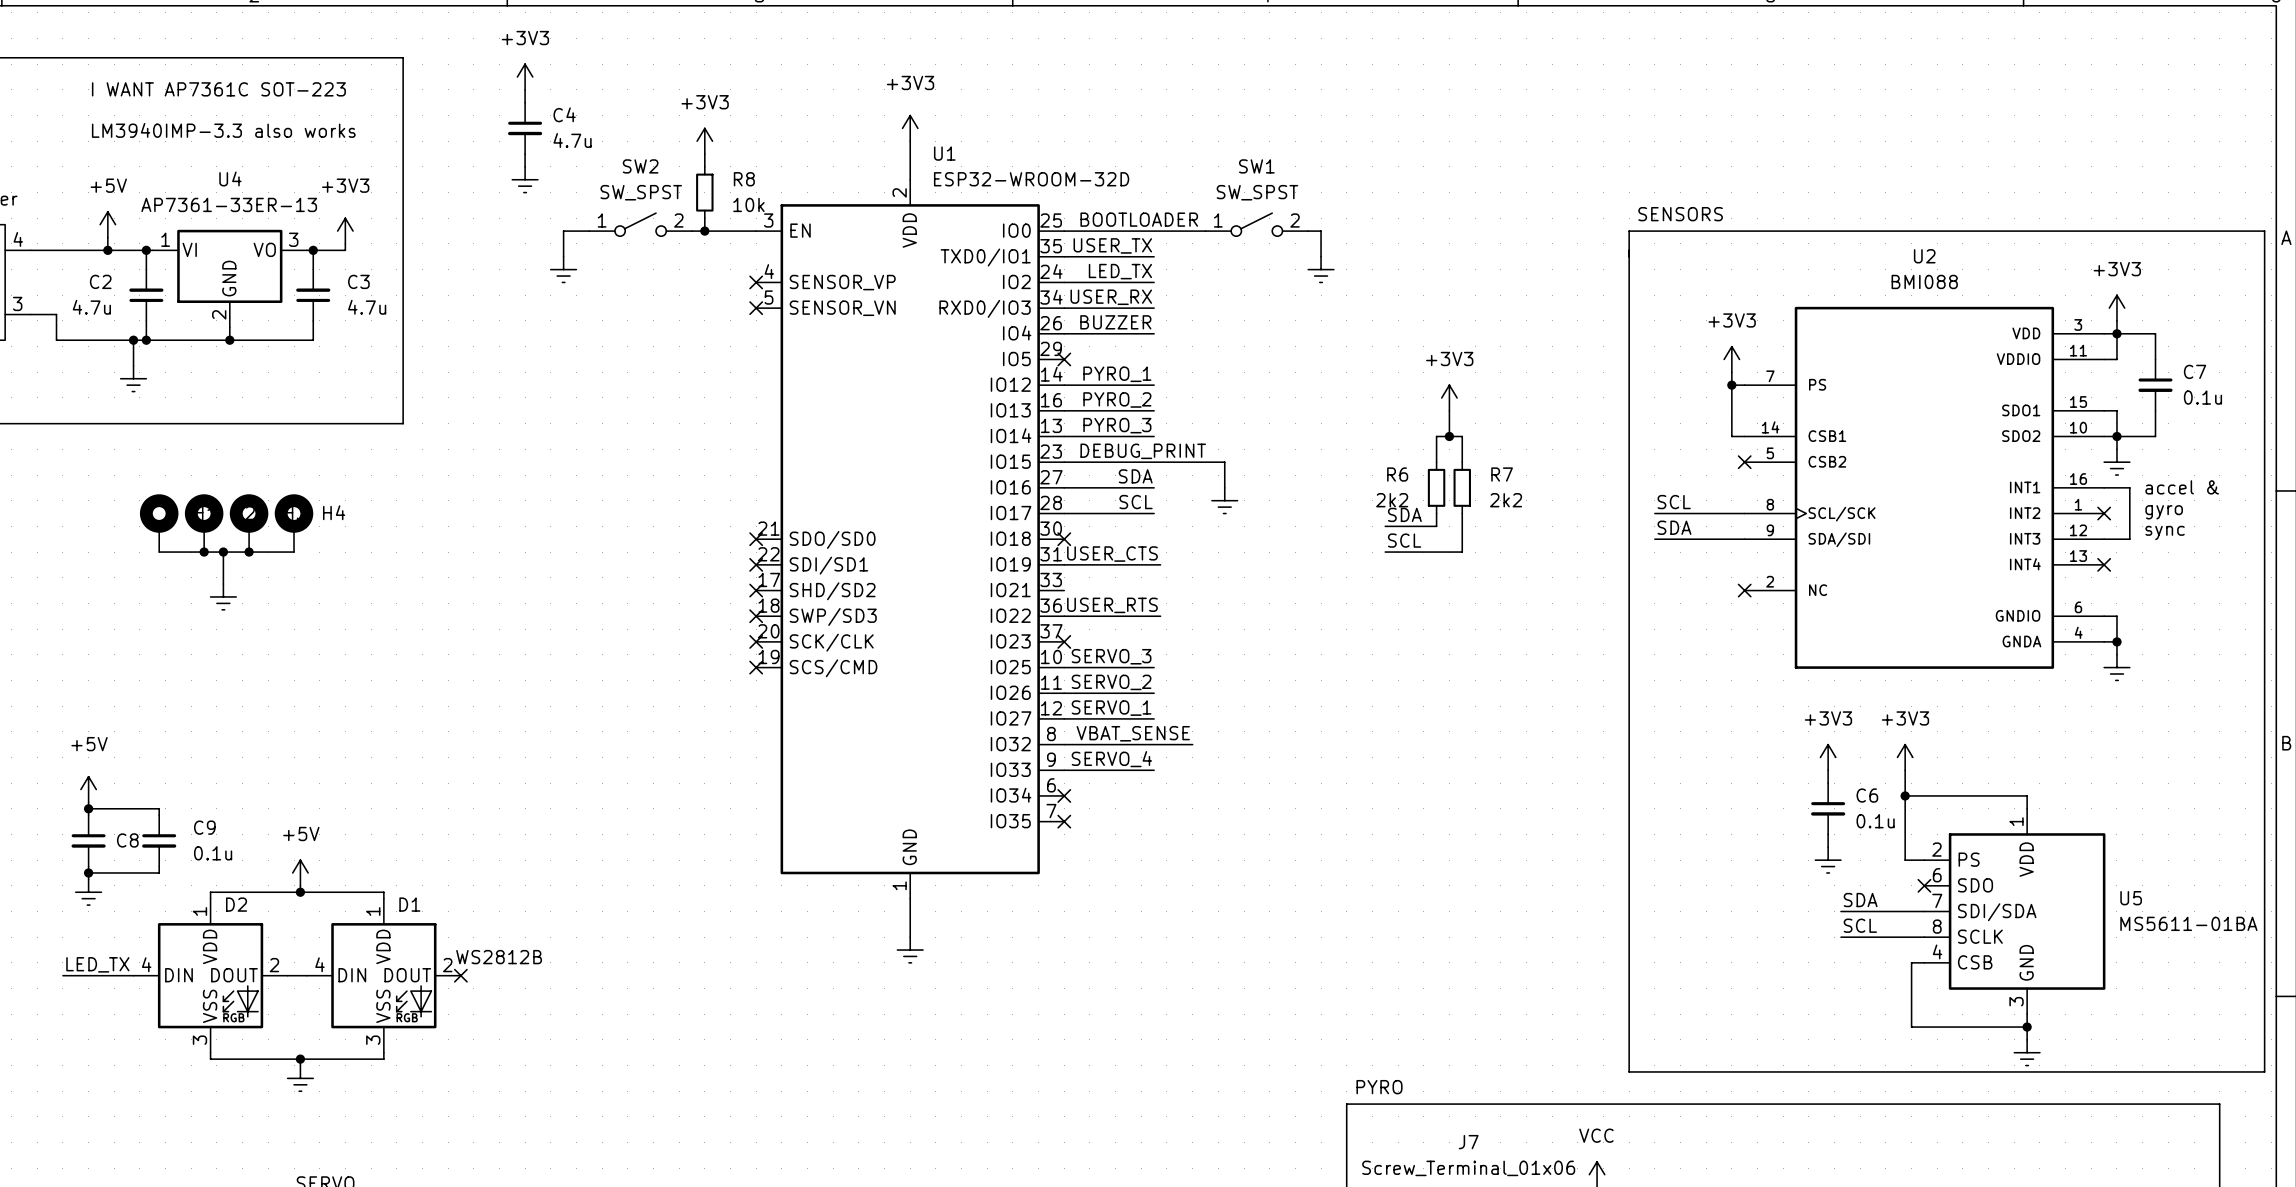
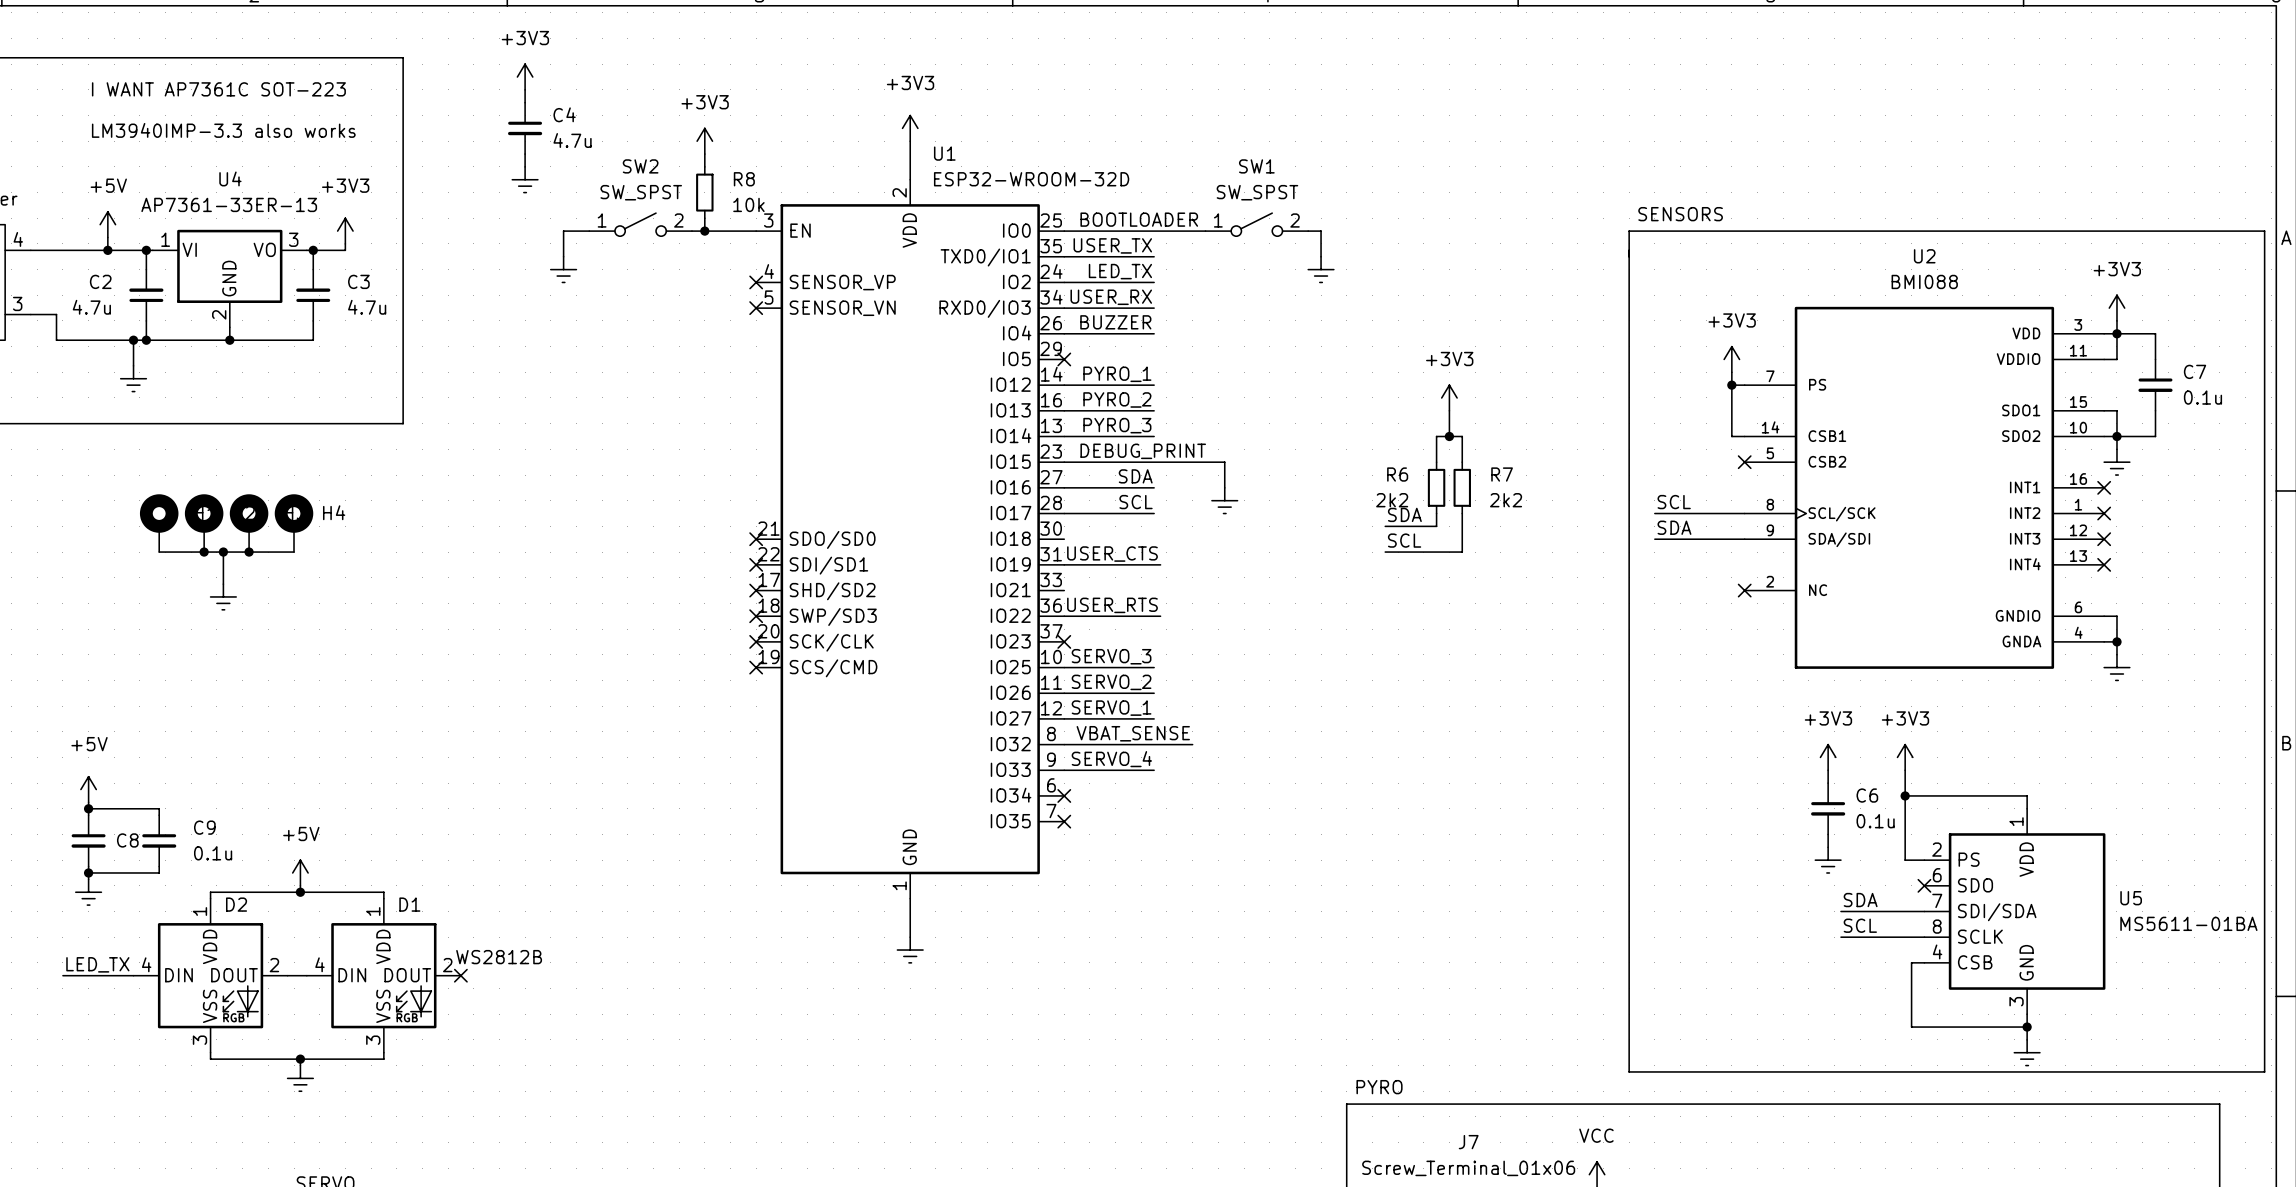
wire: (2104, 487) (2129, 487) (2129, 539) (2104, 539) -> none
no-connect mark: none -> (2104, 487)
text: accel & (2182, 487) -> none
text: gyro (2164, 512) -> none
text: sync (2165, 532) -> none
no-connect mark: (1064, 539) -> none
no-connect mark: none -> (2104, 539)

